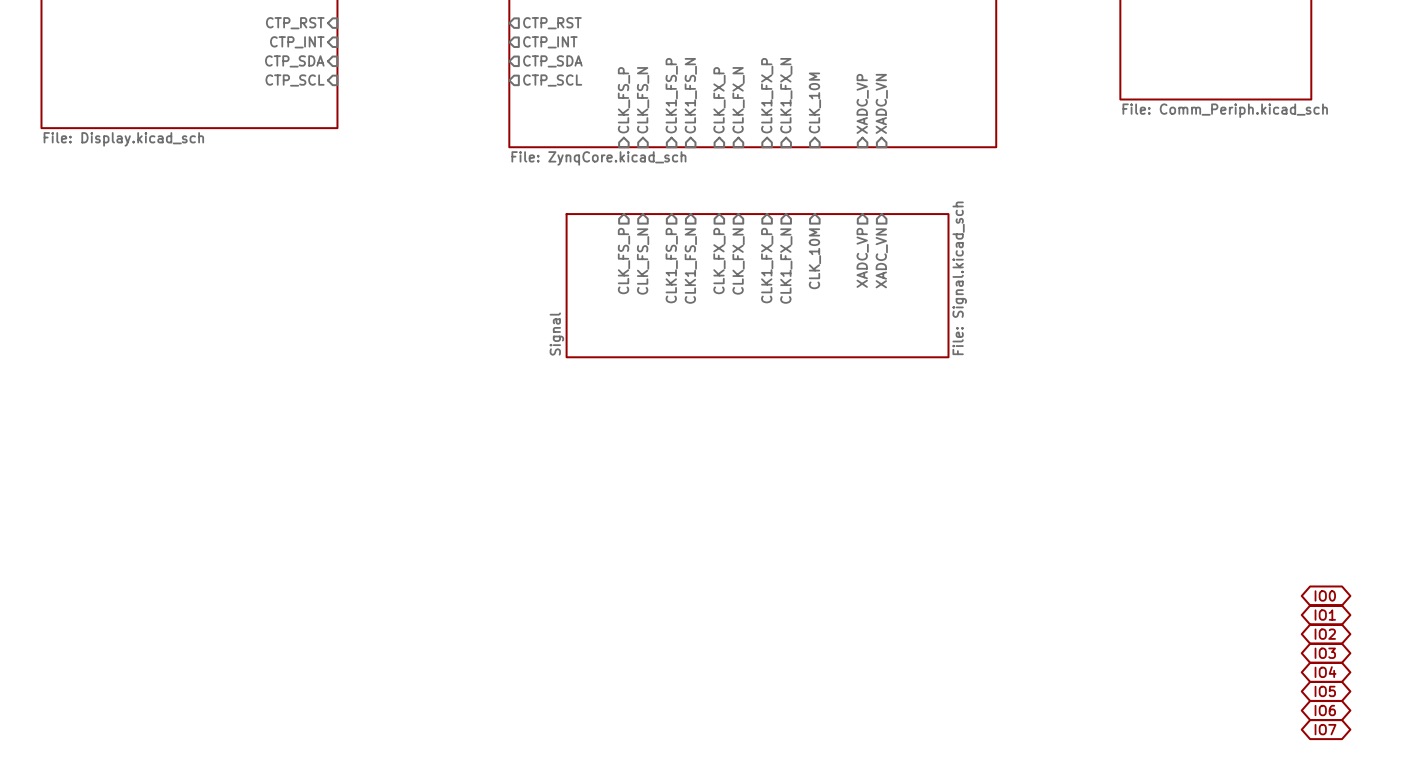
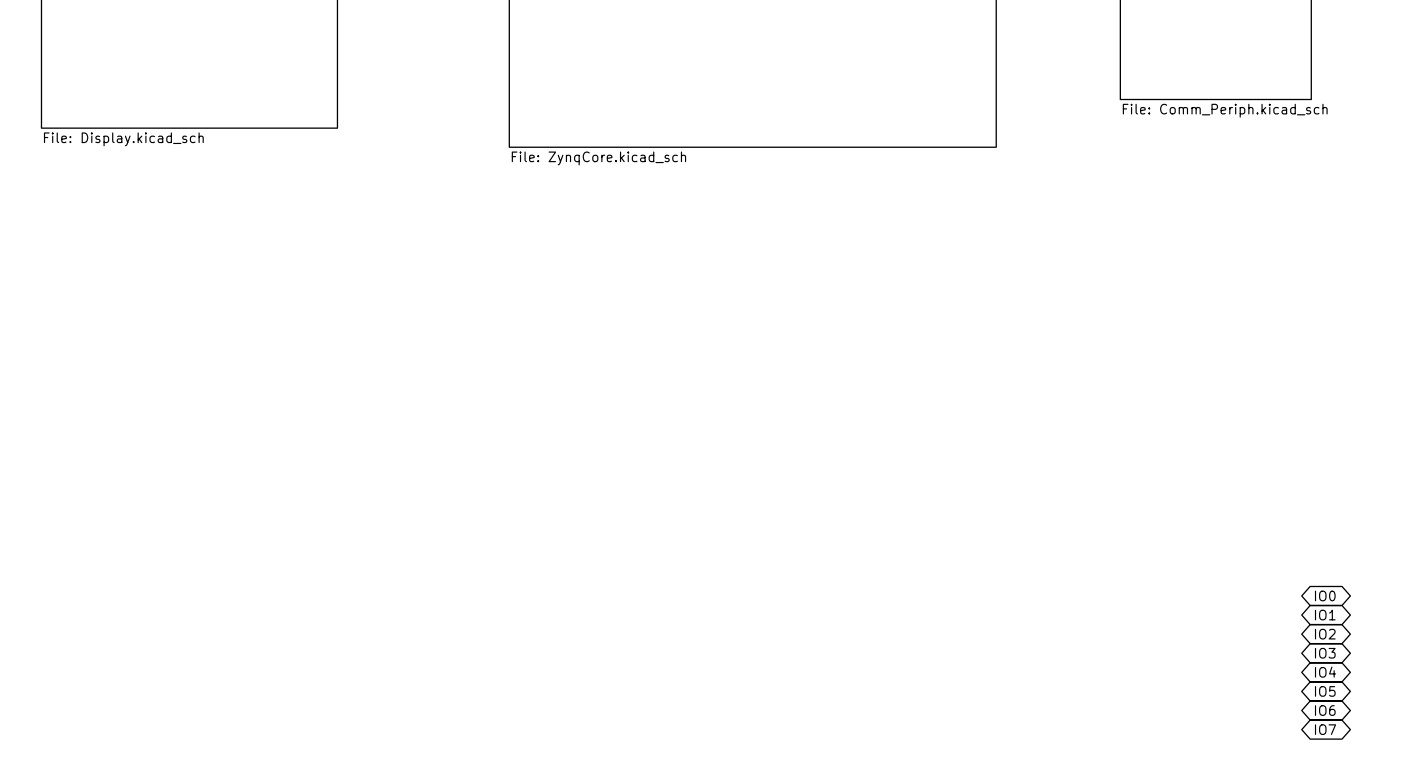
sheet pin: CTP_RST (295, 23) -> none
sheet pin: CTP_RST (552, 23) -> none
sheet pin: CTP_INT (297, 42) -> none
sheet pin: CTP_INT (550, 42) -> none
sheet pin: CTP_SDA (294, 61) -> none
sheet pin: CTP_SDA (552, 61) -> none
sheet pin: CTP_SCL (295, 80) -> none
sheet pin: CTP_SCL (552, 80) -> none
sheet pin: CLK1_FS_P (671, 95) -> none
sheet pin: CLK1_FS_N (690, 95) -> none
sheet pin: CLK1_FX_P (767, 95) -> none
sheet pin: CLK1_FX_N (786, 95) -> none
sheet pin: CLK_FS_P (623, 100) -> none
sheet pin: CLK_FS_N (643, 100) -> none
sheet pin: CLK_FX_P (719, 100) -> none
sheet pin: CLK_FX_N (738, 100) -> none
sheet pin: CLK_10M (814, 102) -> none
sheet pin: XADC_VP (862, 103) -> none
sheet pin: XADC_VN (881, 103) -> none
sheet pin: XADC_VP (862, 257) -> none
sheet pin: CLK_10M (814, 258) -> none
sheet pin: XADC_VN (881, 258) -> none
sheet pin: CLK_FS_P (623, 261) -> none
sheet pin: CLK_FS_N (643, 261) -> none
sheet pin: CLK_FX_P (719, 261) -> none
sheet pin: CLK_FX_N (738, 261) -> none
sheet pin: CLK1_FS_P (671, 265) -> none
sheet pin: CLK1_FX_P (767, 265) -> none
sheet pin: CLK1_FS_N (690, 266) -> none
sheet pin: CLK1_FX_N (786, 266) -> none
sheet Signal: File: Signal.kicad_sch (757, 285) -> none

